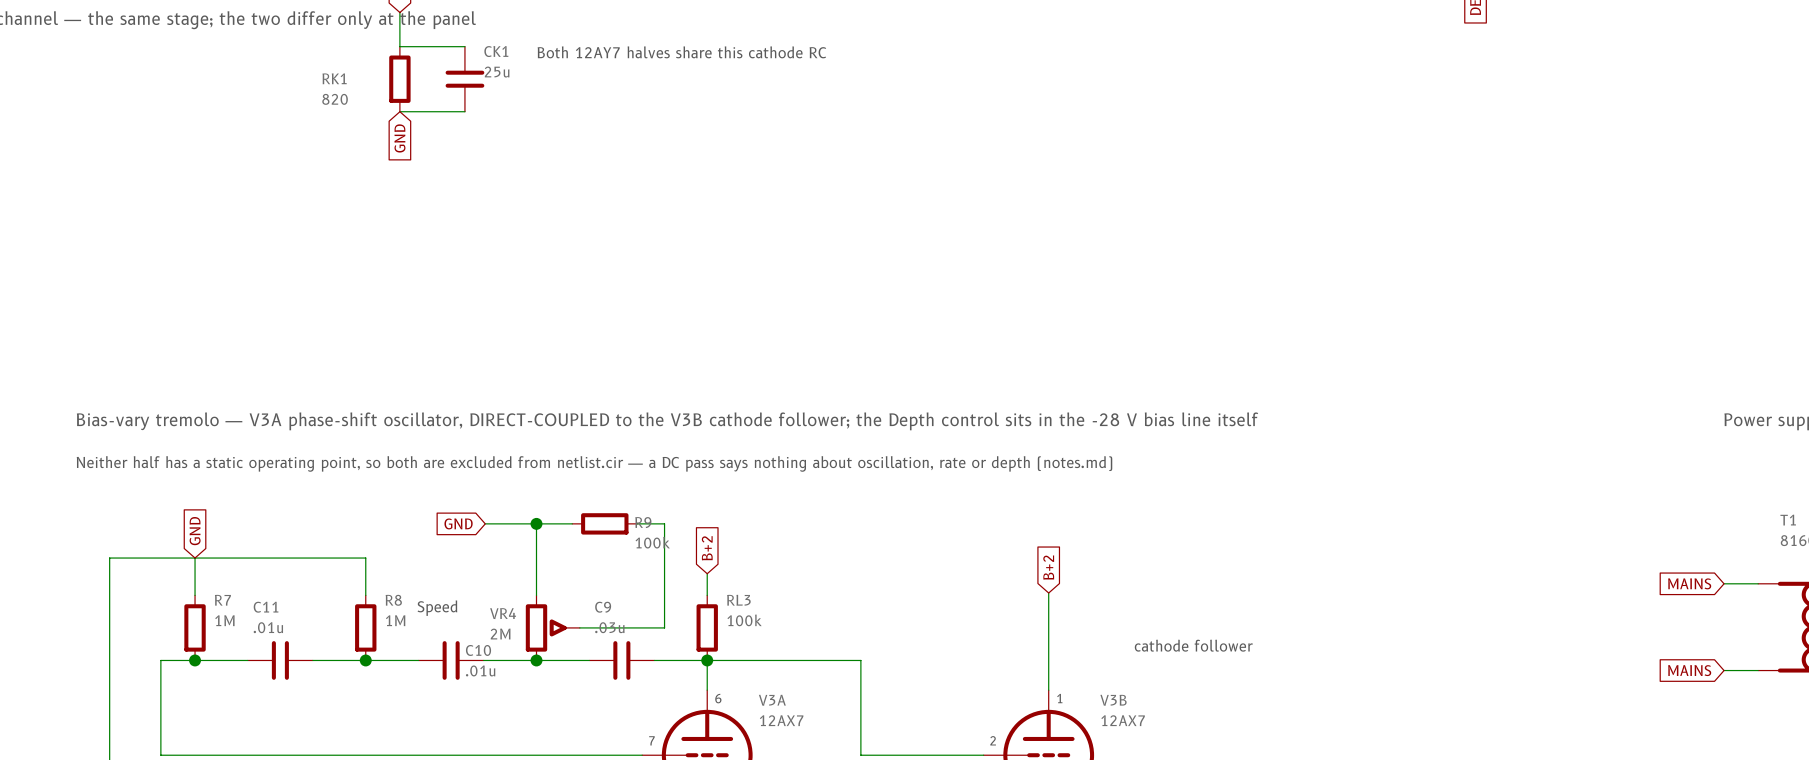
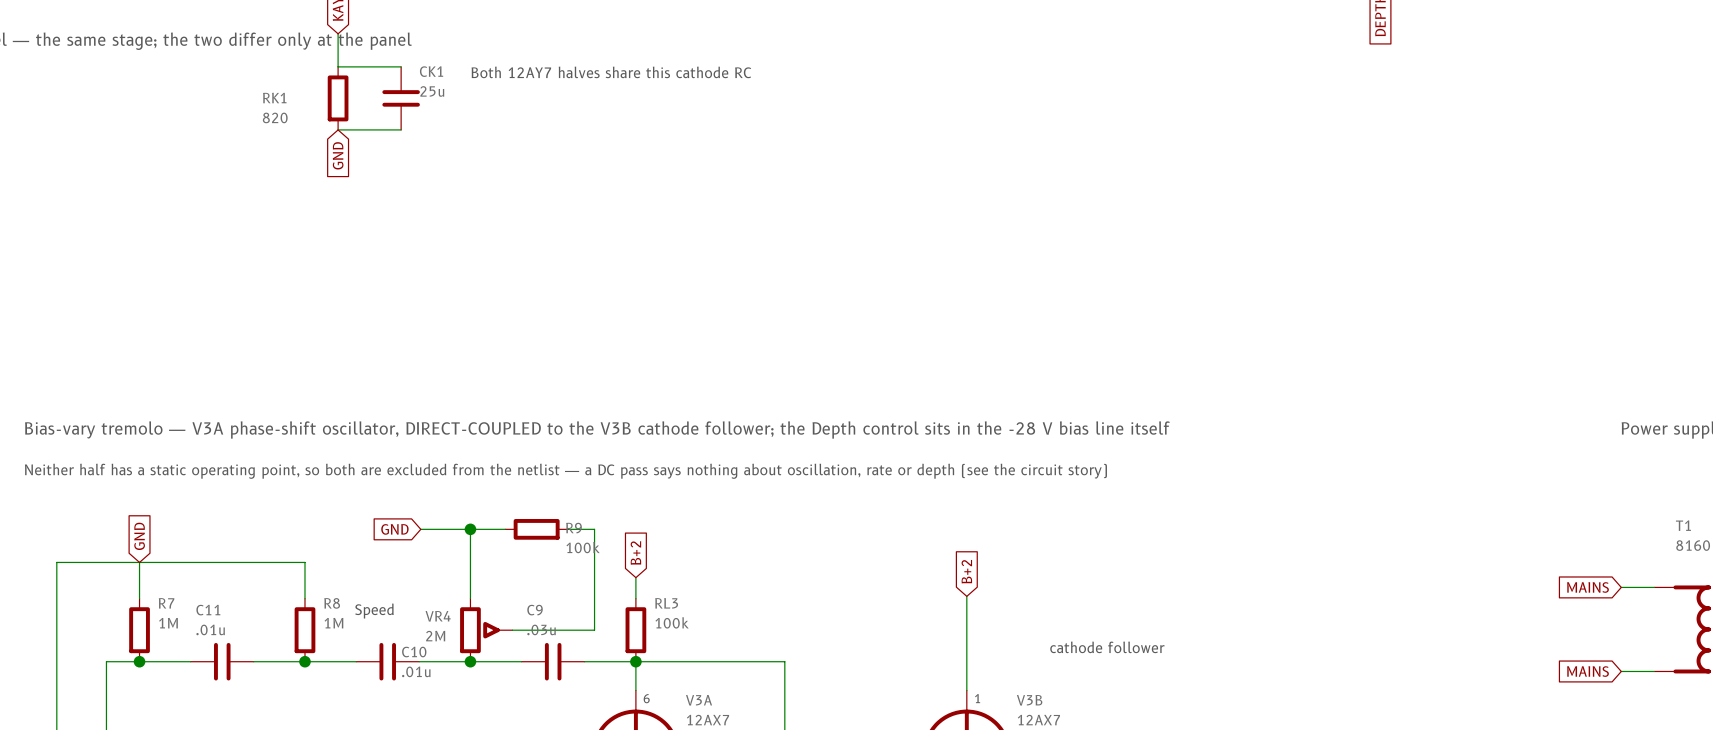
text: Neither half has a static operating point, so both are excluded from netlist.cir — a DC pass says nothing about oscillation, rate or depth (notes.md) (594, 463) -> Neither half has a static operating point, so both are excluded from the netlist — a DC pass says nothing about oscillation, rate or depth (see the circuit story) (565, 471)

